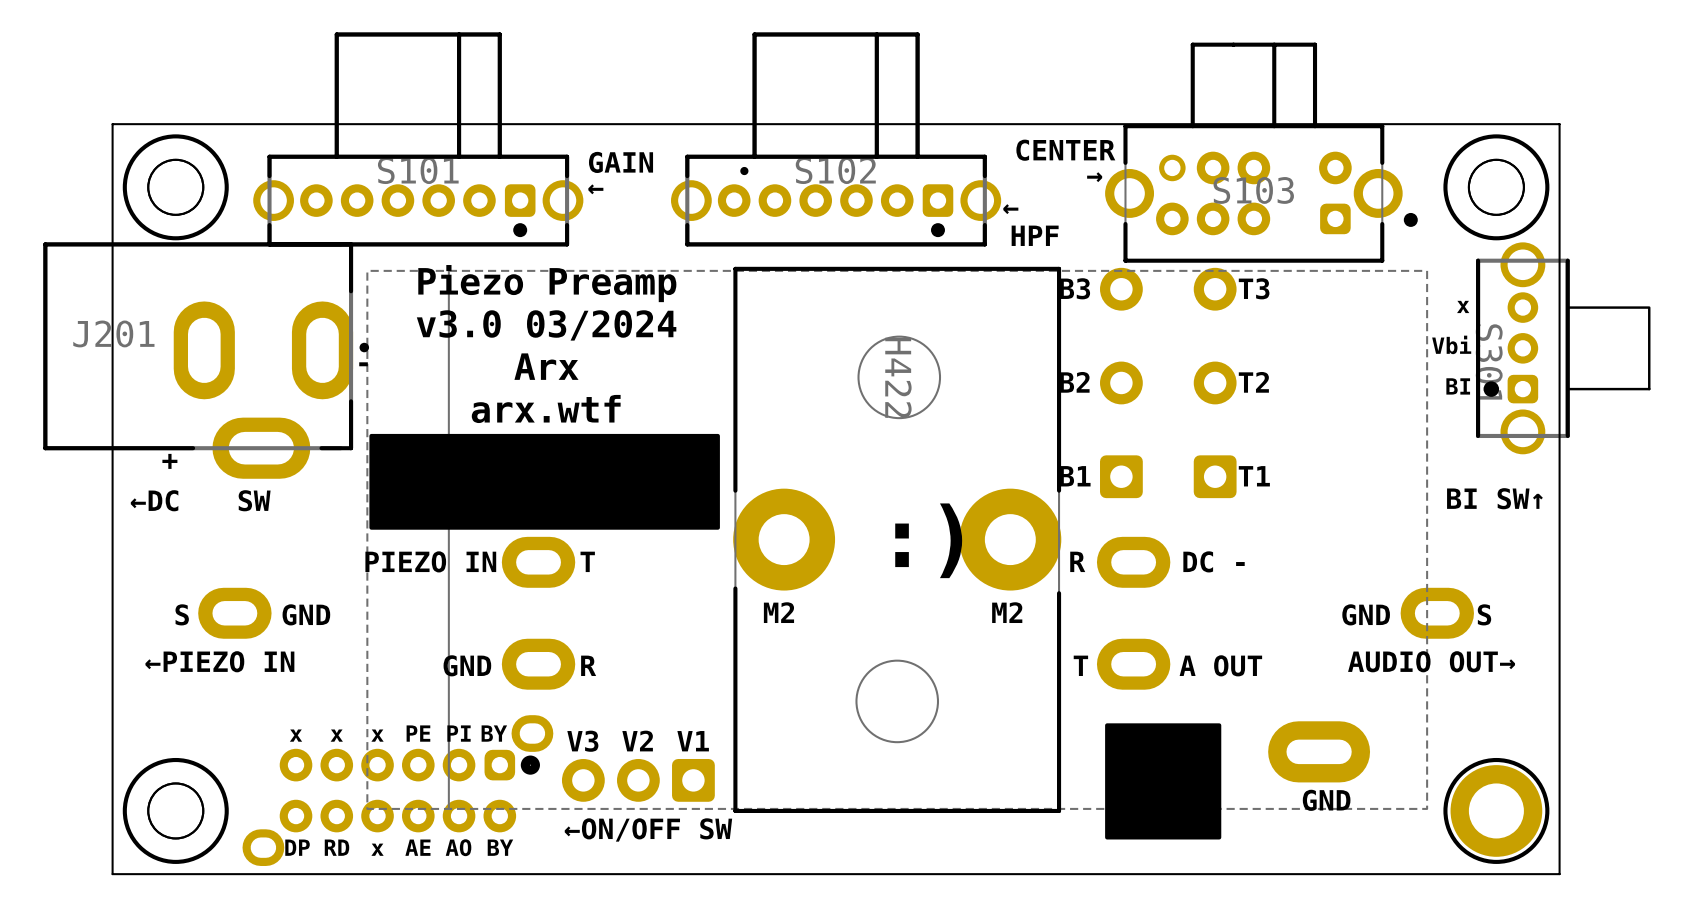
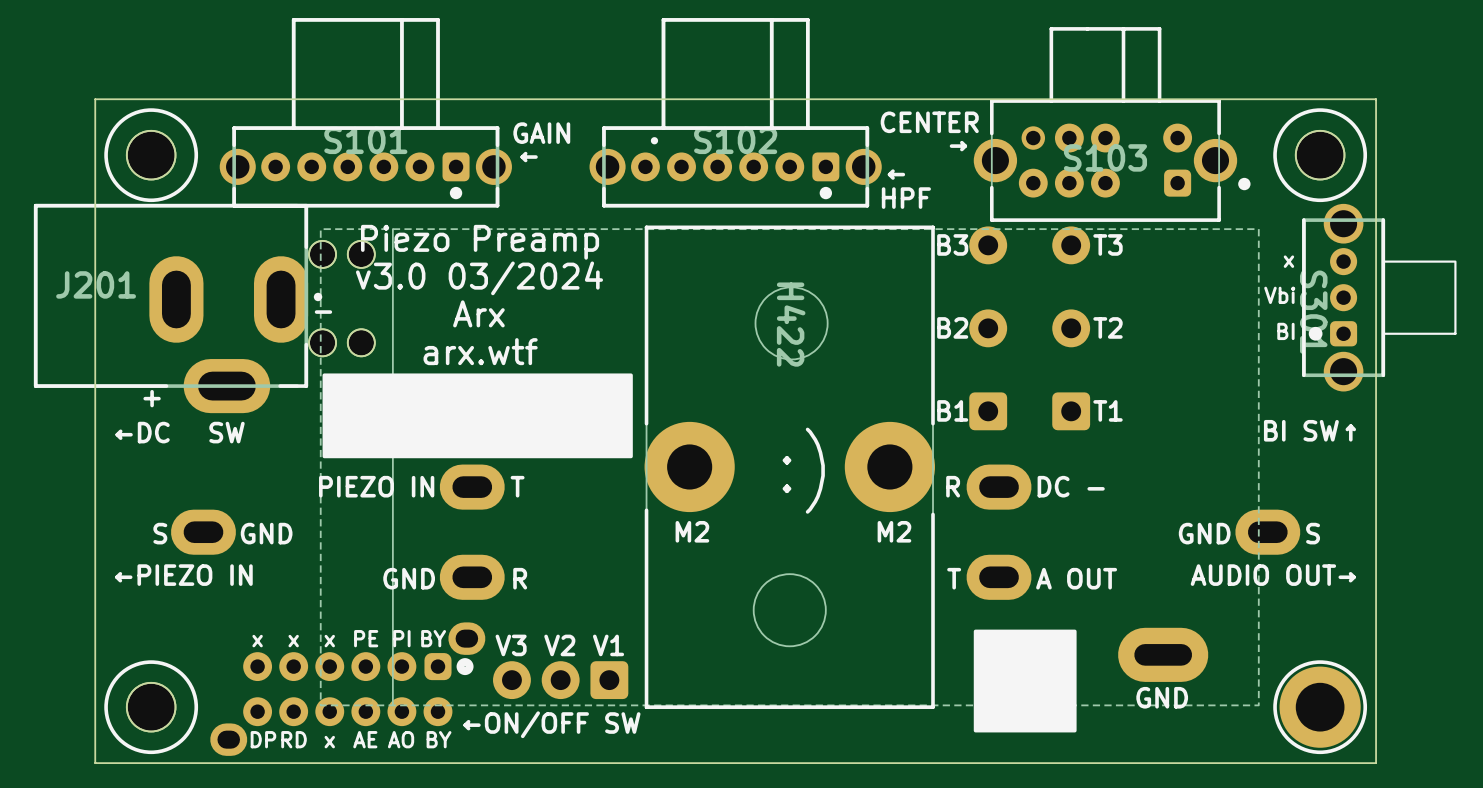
part: none -> (322, 254)
part: none -> (361, 254)
part: none -> (322, 342)
part: none -> (361, 342)

